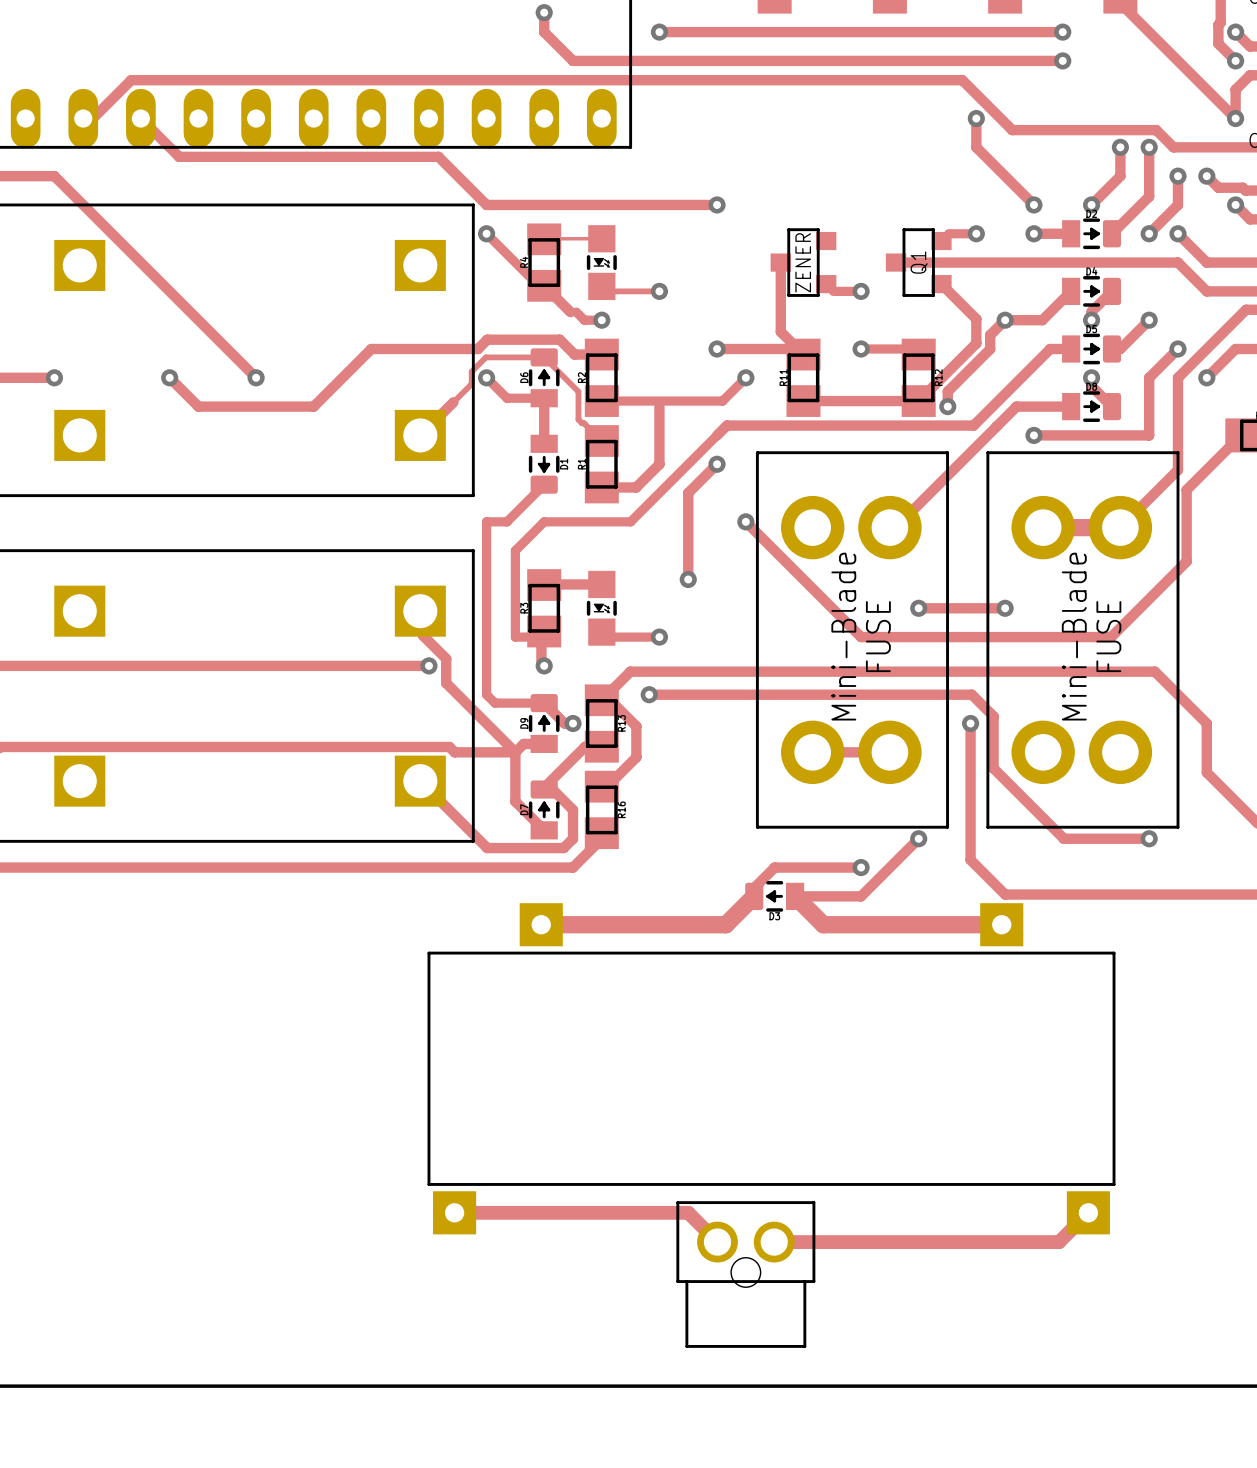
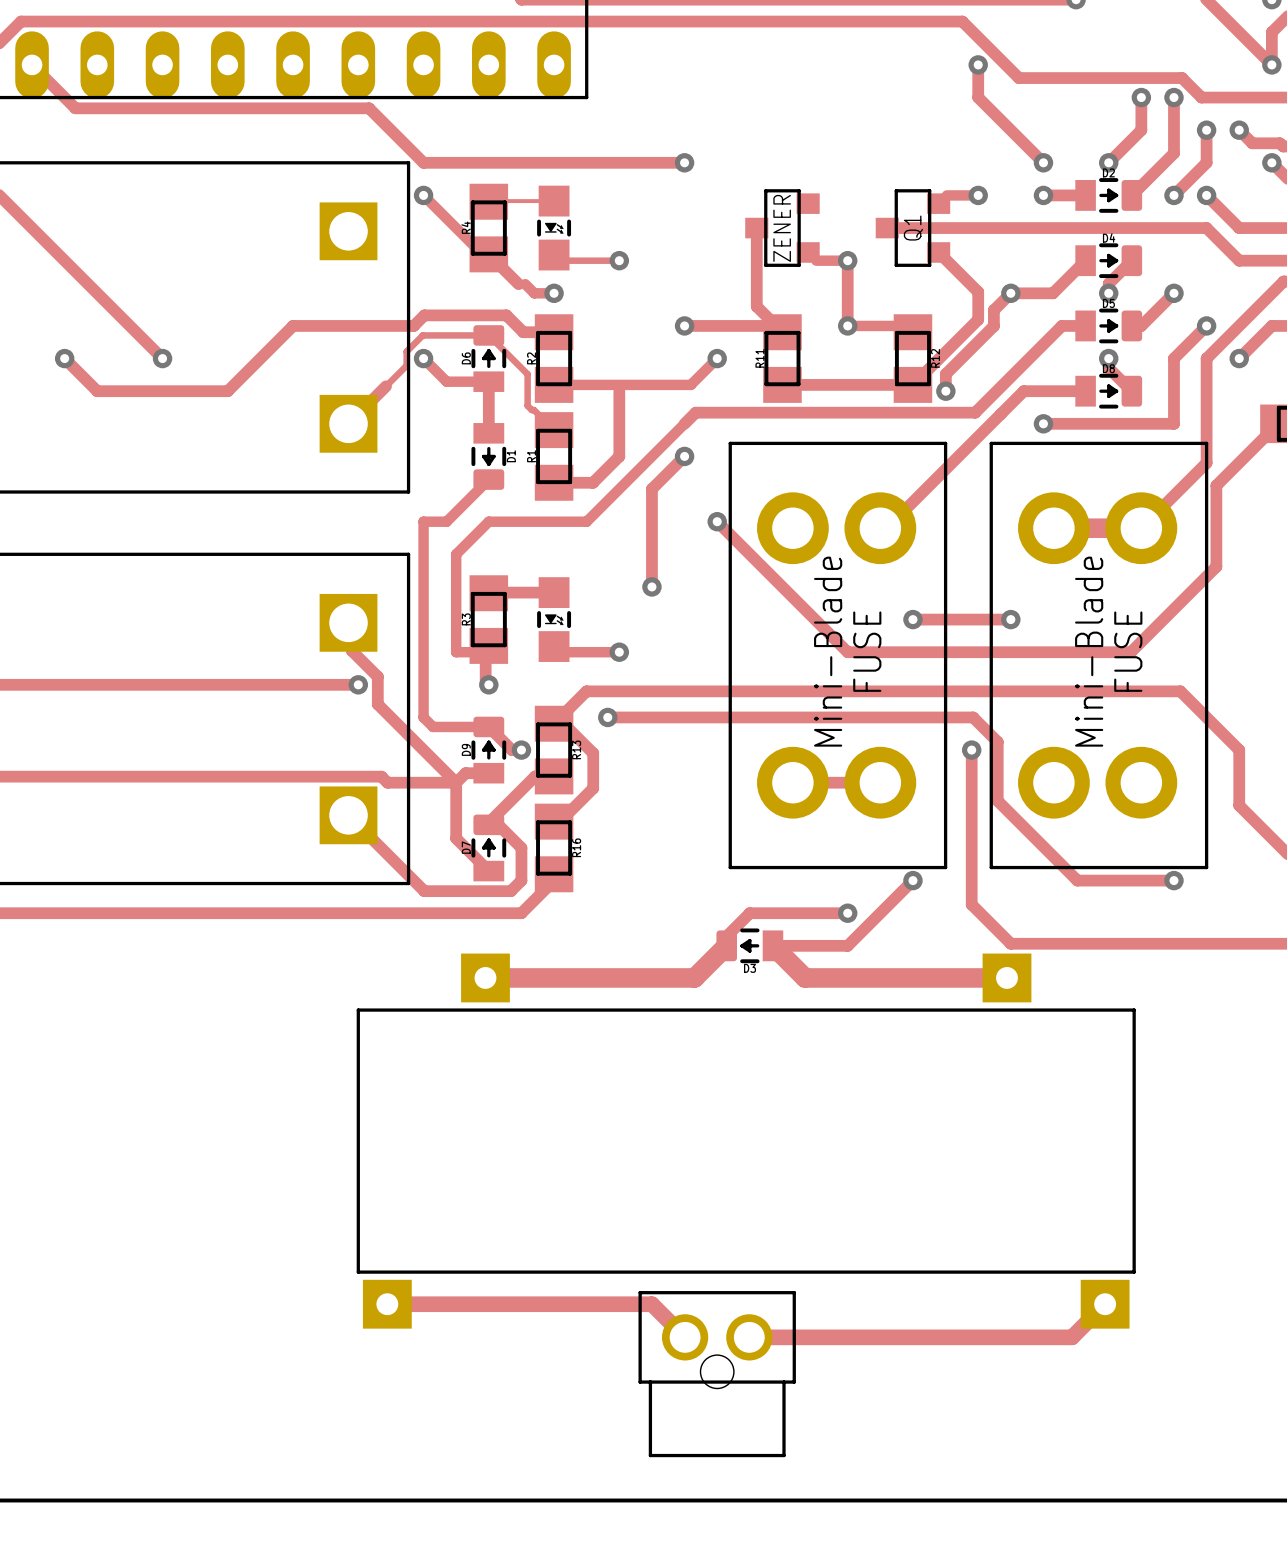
track: none -> (847, 260) (847, 325)

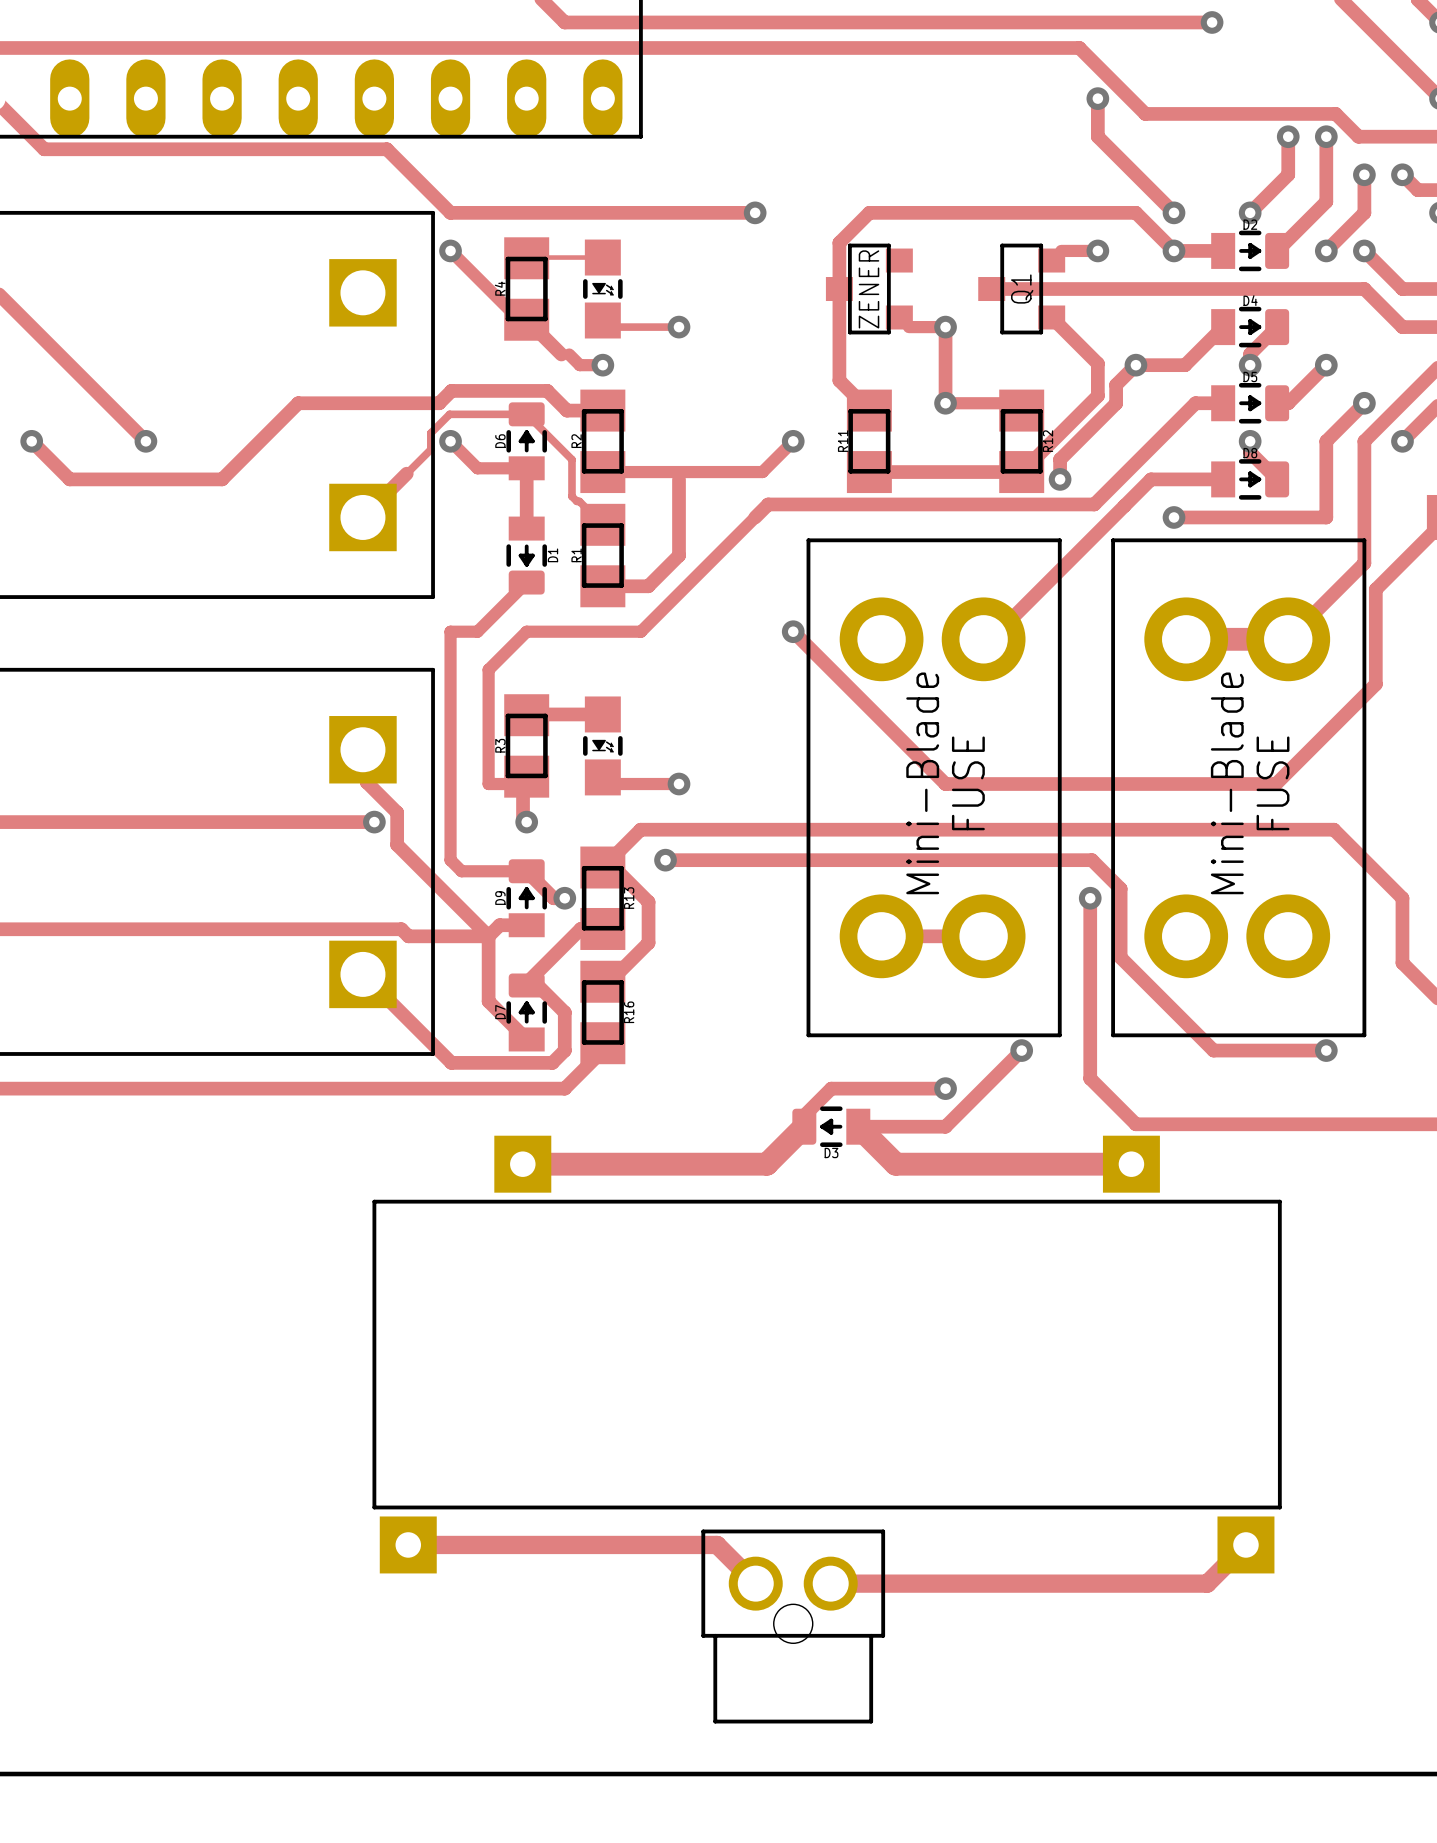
track: none -> (1174, 250) (1135, 212) (869, 212) (839, 242) (839, 289) (831, 280)
track: (684, 325) (776, 325) -> none
via: (684, 325) -> none
track: (684, 456) (651, 489) (651, 586) -> none
via: (684, 456) -> none
via: (651, 586) -> none
track: (912, 619) (1010, 619) -> none
via: (912, 619) -> none
via: (1010, 619) -> none

